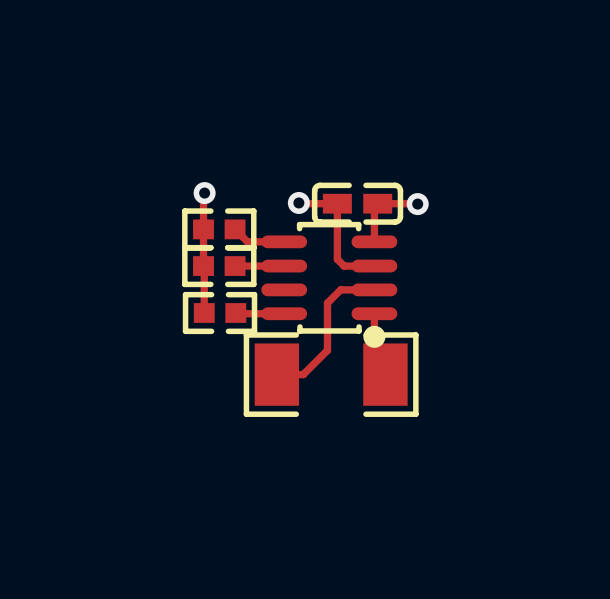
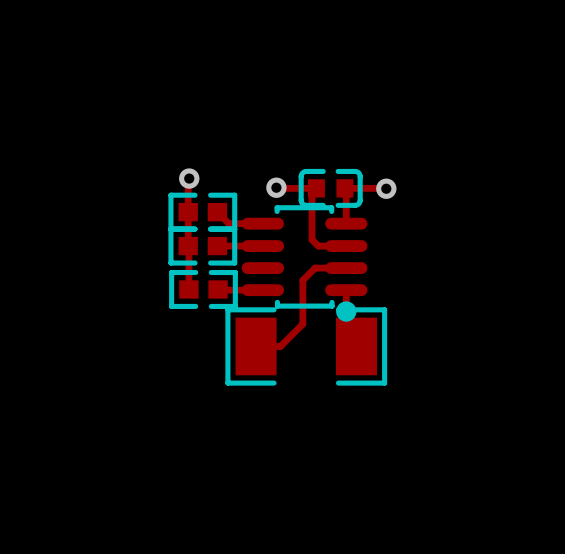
part footprint: [311, 182, 404, 225] -> [298, 168, 363, 208]

